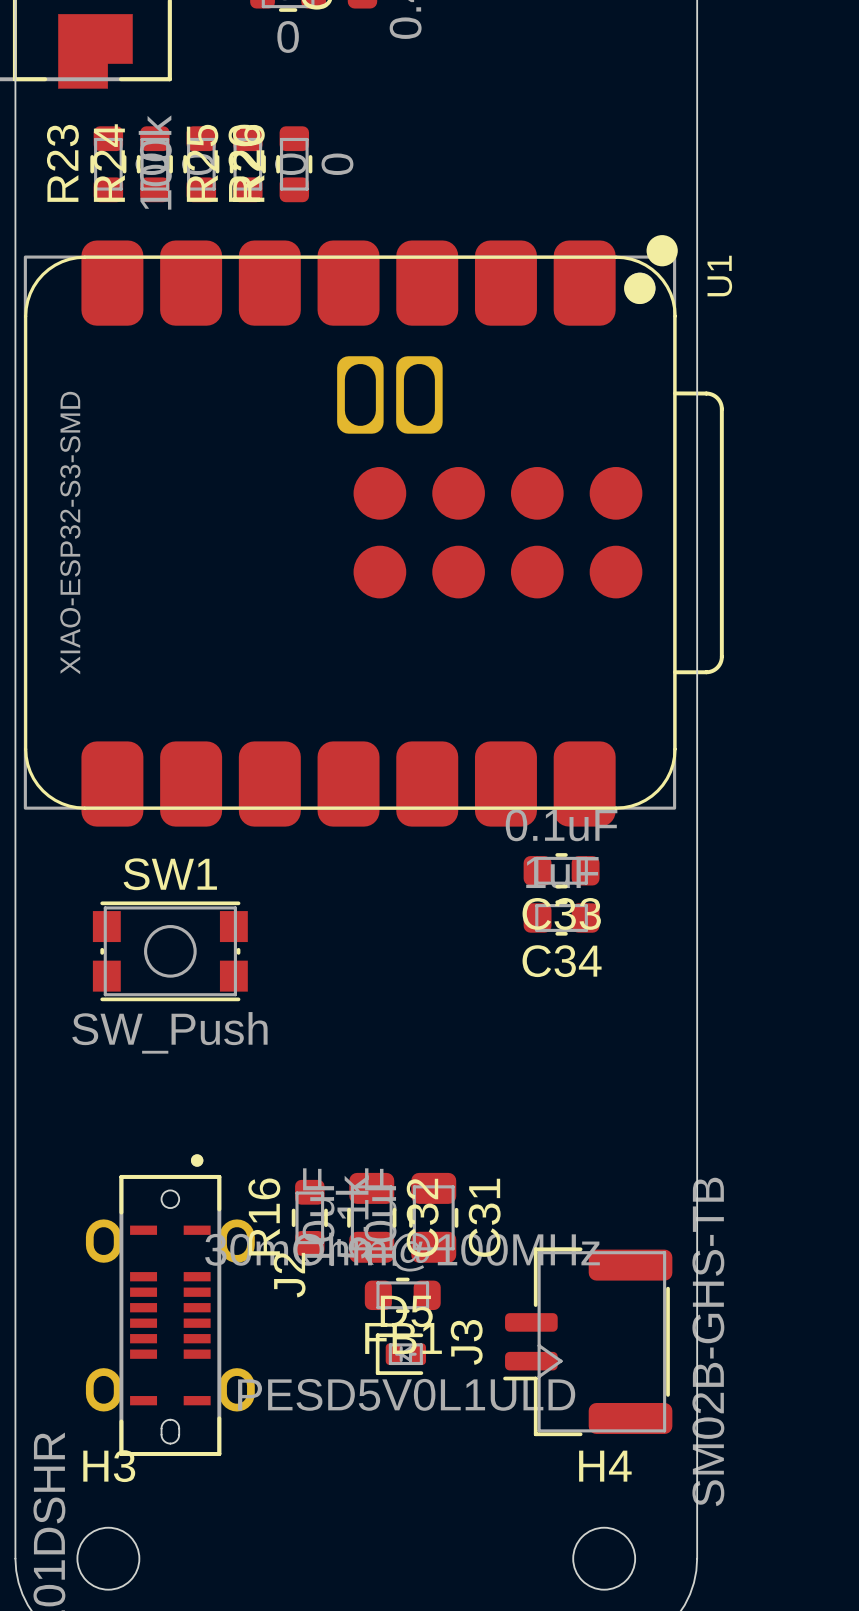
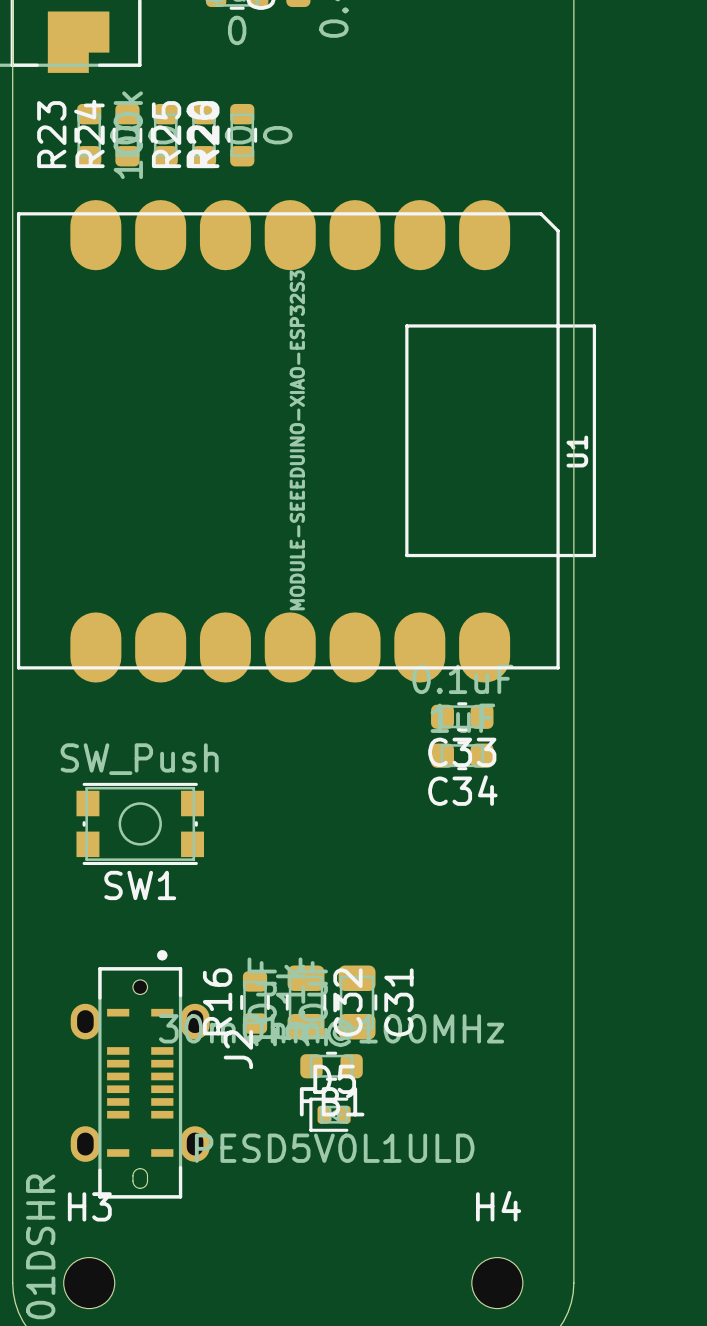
U1 footprint: [23, 235, 724, 827] -> [16, 200, 597, 683]
U1 name position: U1 (719, 276) -> U1 (577, 451)
U1 value: XIAO-ESP32-S3-SMD (70, 533) -> MODULE-SEEEDUINO-XIAO-ESP32S3 (297, 440)
SW1 name position: SW1 (170, 874) -> SW1 (140, 885)
SW1 position: (170, 951) -> (140, 823)
SW1 value position: SW_Push (169, 1032) -> SW_Push (139, 759)
J3: SM02B-GHS-TB (587, 1341) -> none

